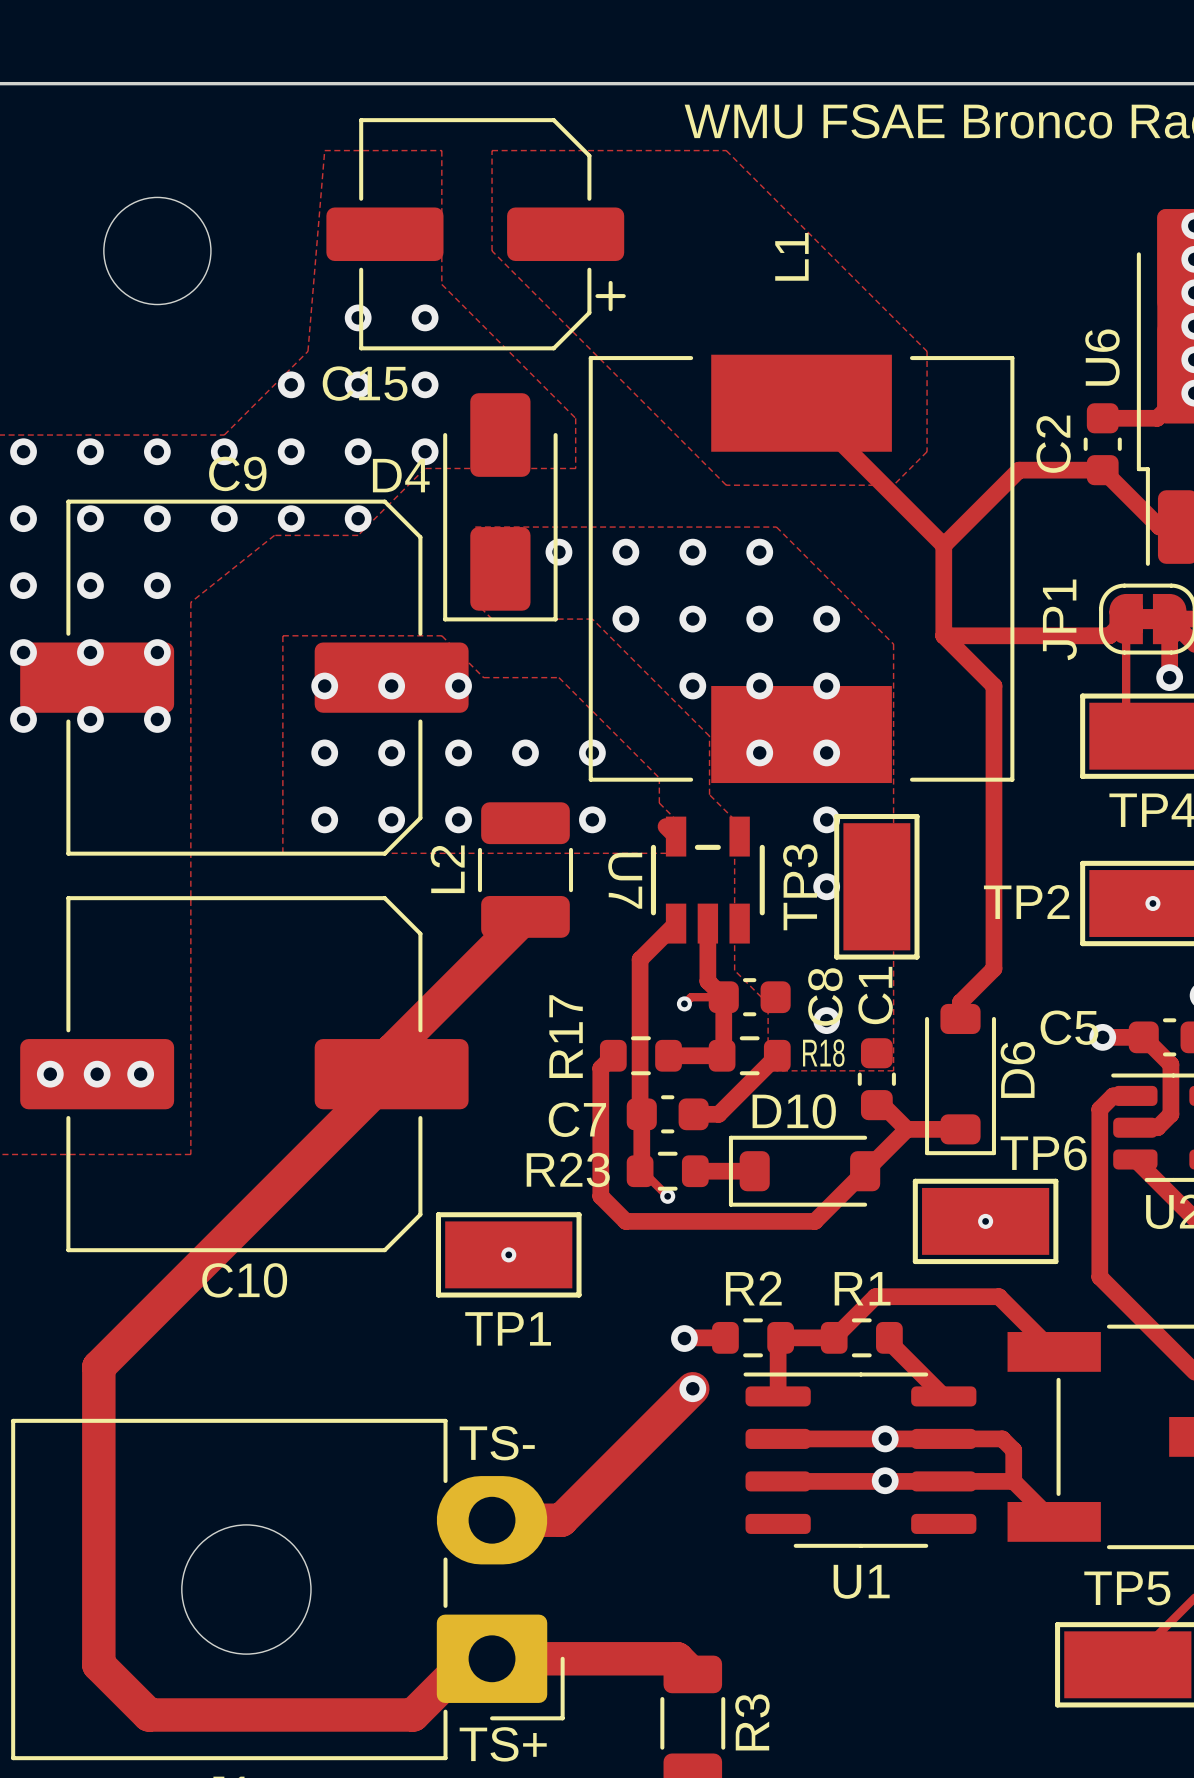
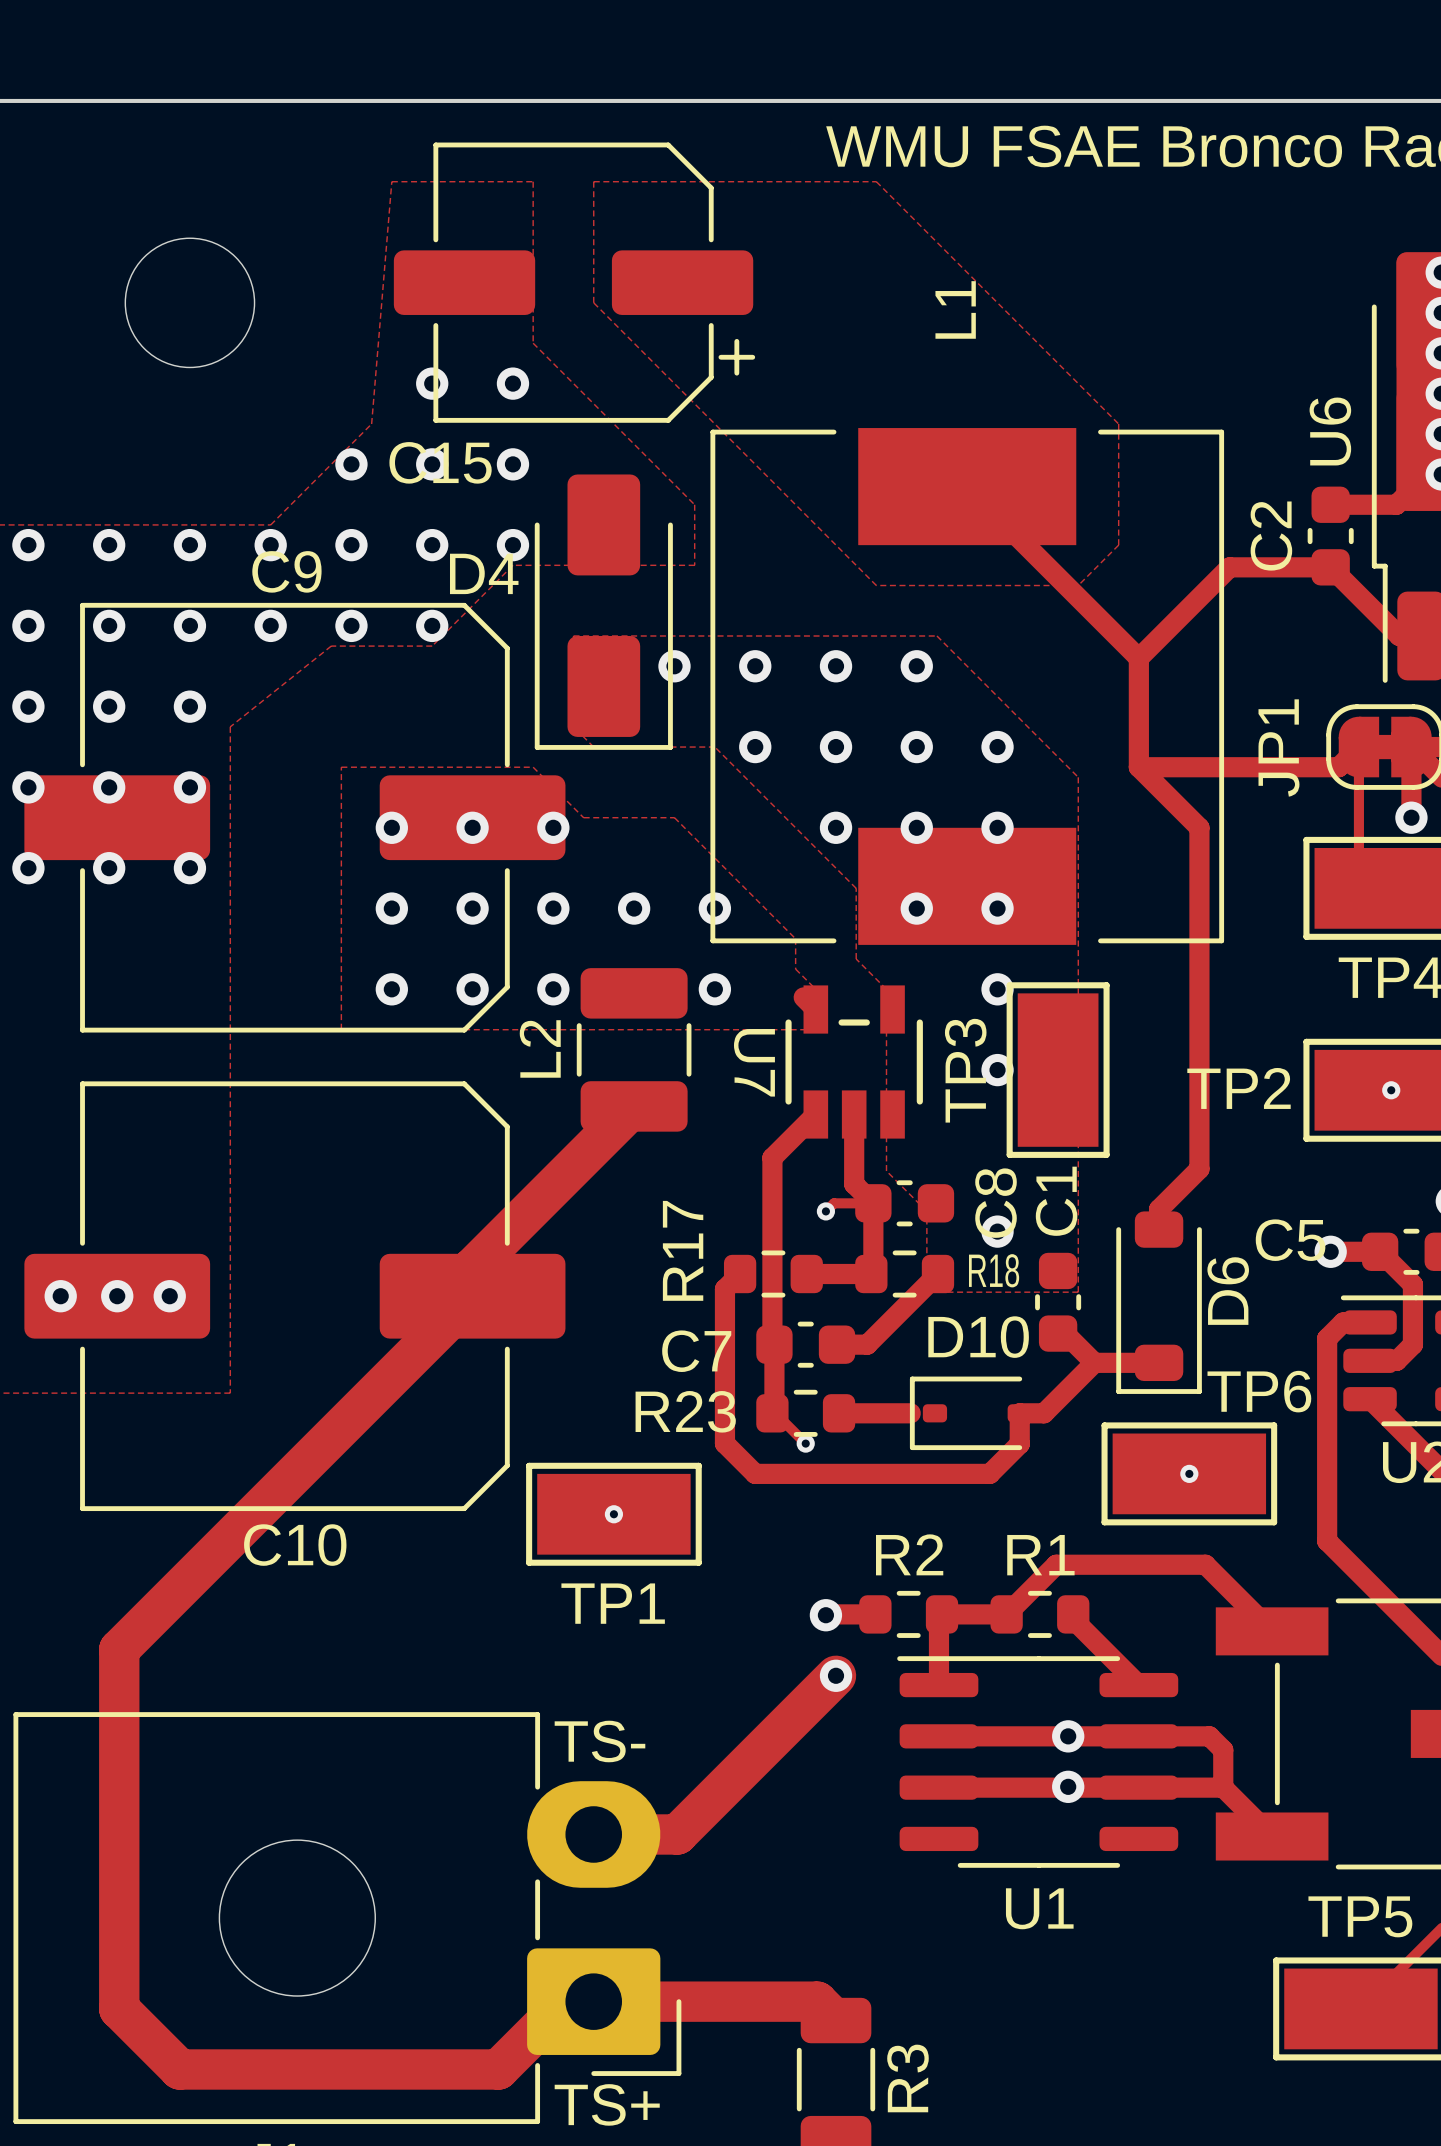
D10 name position: D10 (794, 1111) -> D10 (978, 1337)
D10 footprint: [728, 1135, 881, 1207] -> [909, 1376, 1032, 1451]
track: (865, 1171) (814, 1221) -> (1043, 1413) (1019, 1413) (1019, 1444) (989, 1473) (983, 1473)

